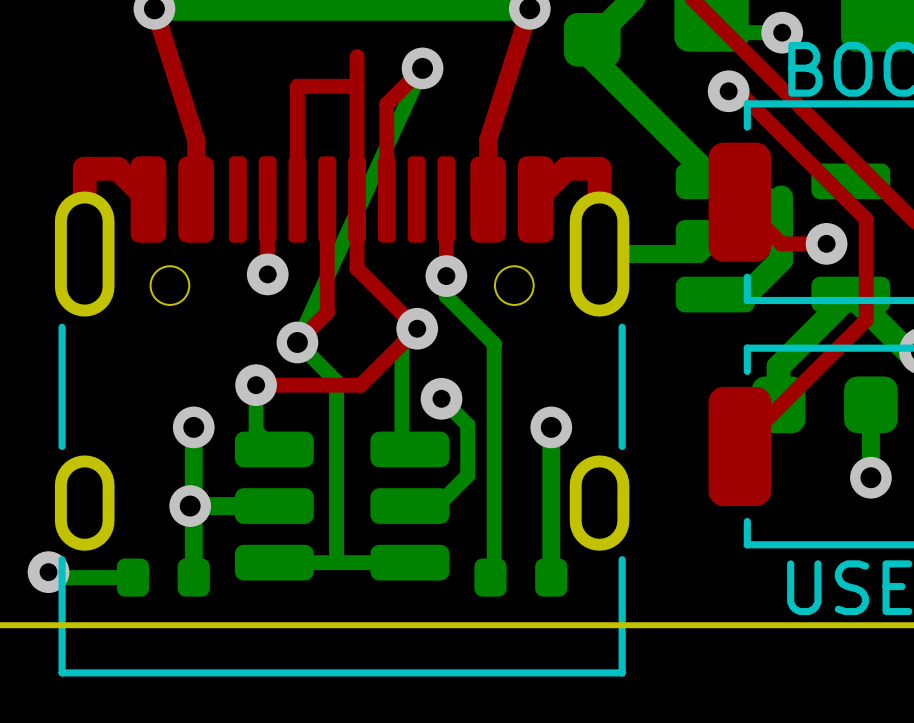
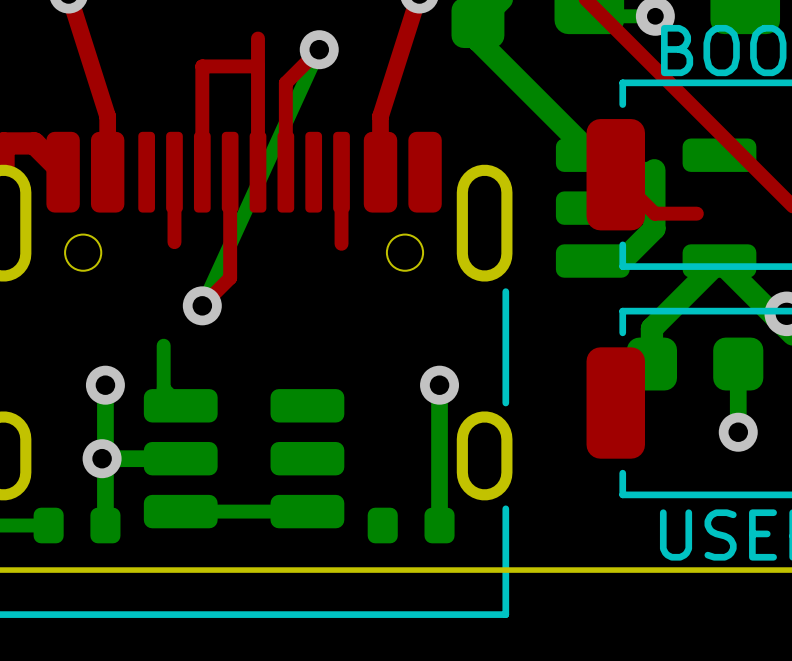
top track: (728, 91) (738, 91) (866, 219) (866, 320) (739, 446) -> none
via: (728, 91) -> none
top track: (357, 199) (357, 268) (417, 328) (360, 385) (256, 385) -> none
top track: (535, 199) (566, 168) (599, 168) (599, 254) -> none
bottom track: (715, 237) (699, 253) (599, 253) -> none
via: (826, 243) -> none
via: (267, 274) -> none
bottom track: (446, 276) (446, 296) (494, 343) (494, 573) (490, 577) -> none
via: (446, 276) -> none
bottom track: (417, 328) (401, 344) (401, 441) (409, 449) -> none
via: (417, 328) -> none
bottom track: (297, 342) (336, 381) (336, 562) -> none
via: (256, 385) -> none
bottom track: (441, 398) (467, 424) (467, 475) (437, 506) (409, 506) -> none
via: (441, 398) -> none

